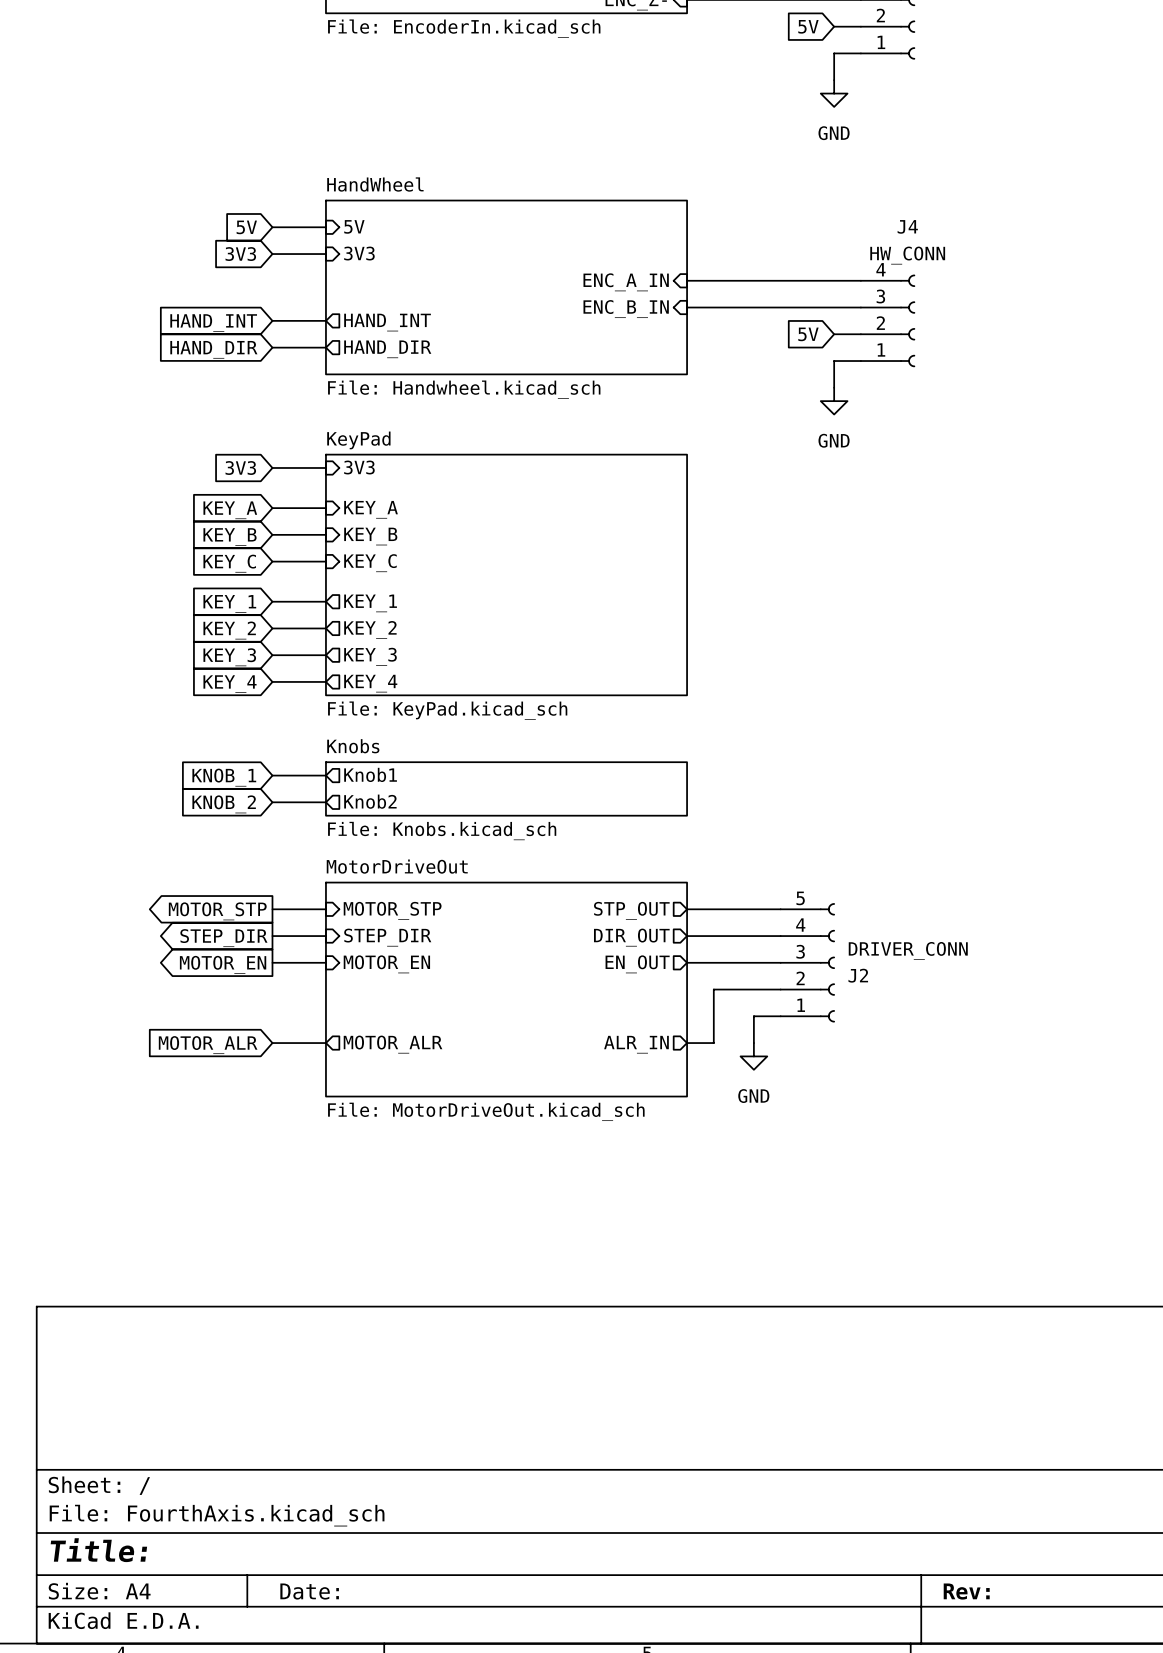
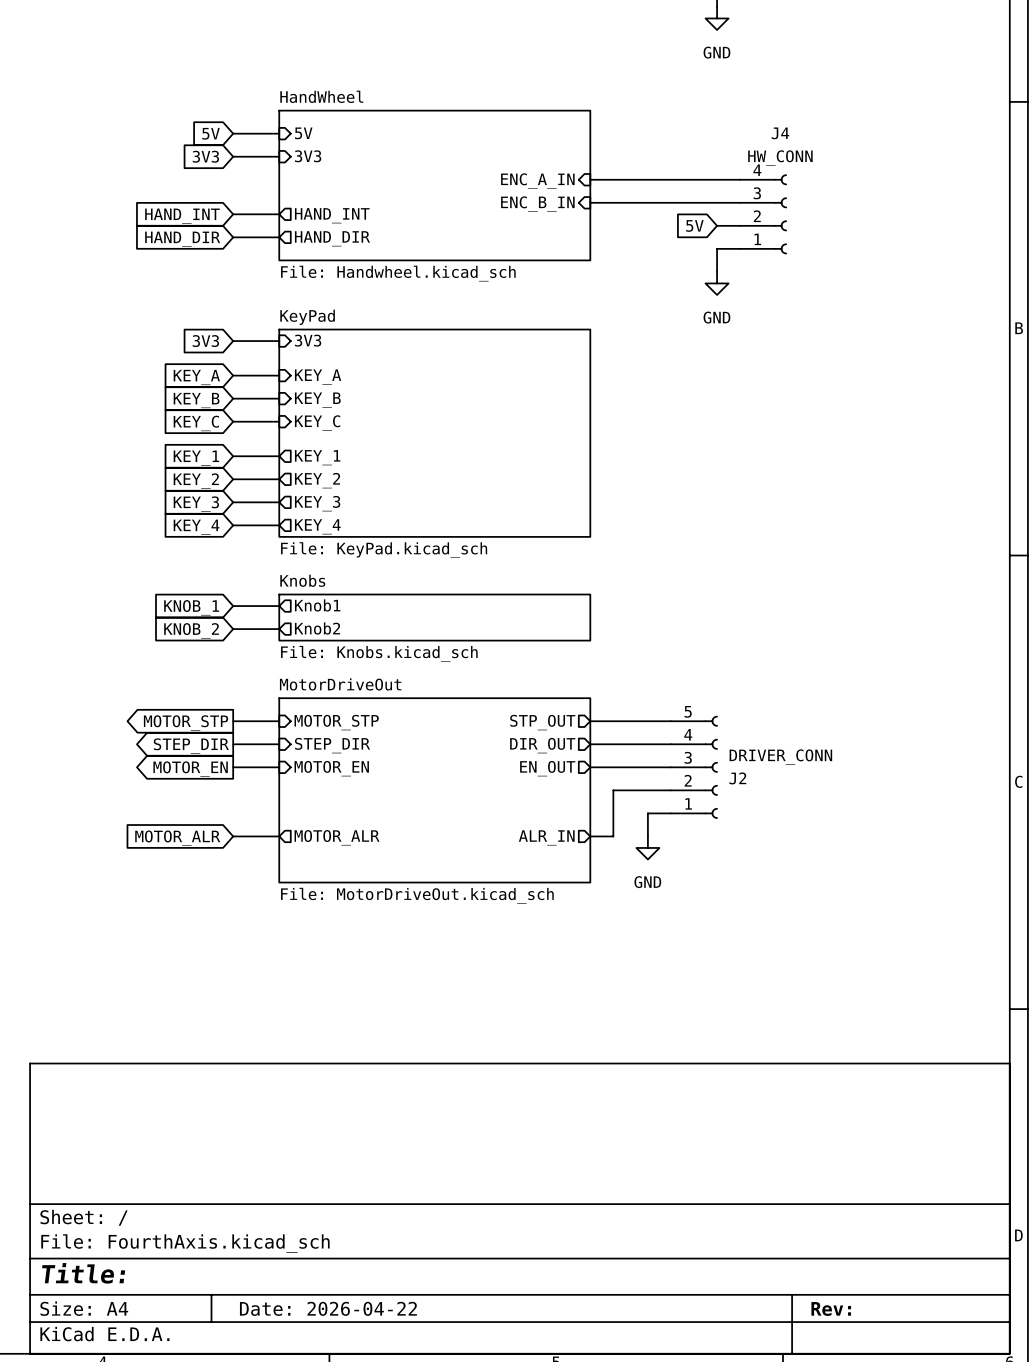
title block: Date: (309, 1591) -> Date: 2026-04-22 (328, 1308)

